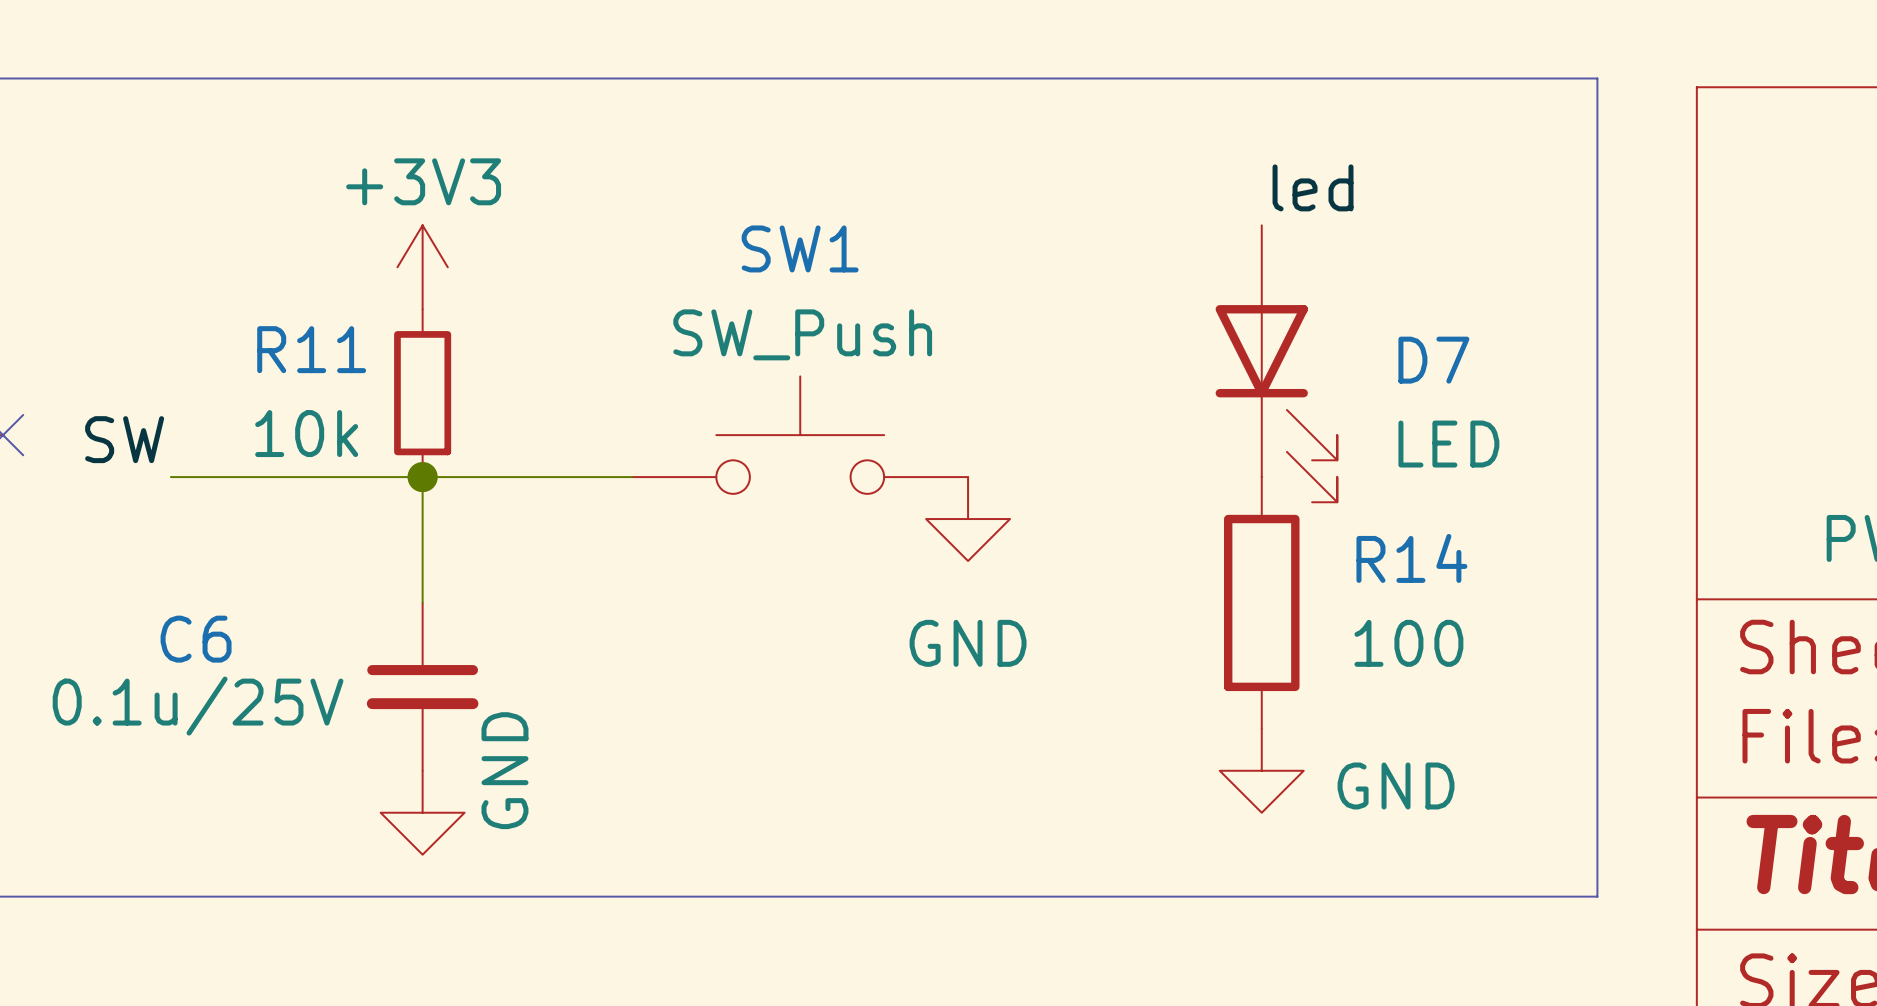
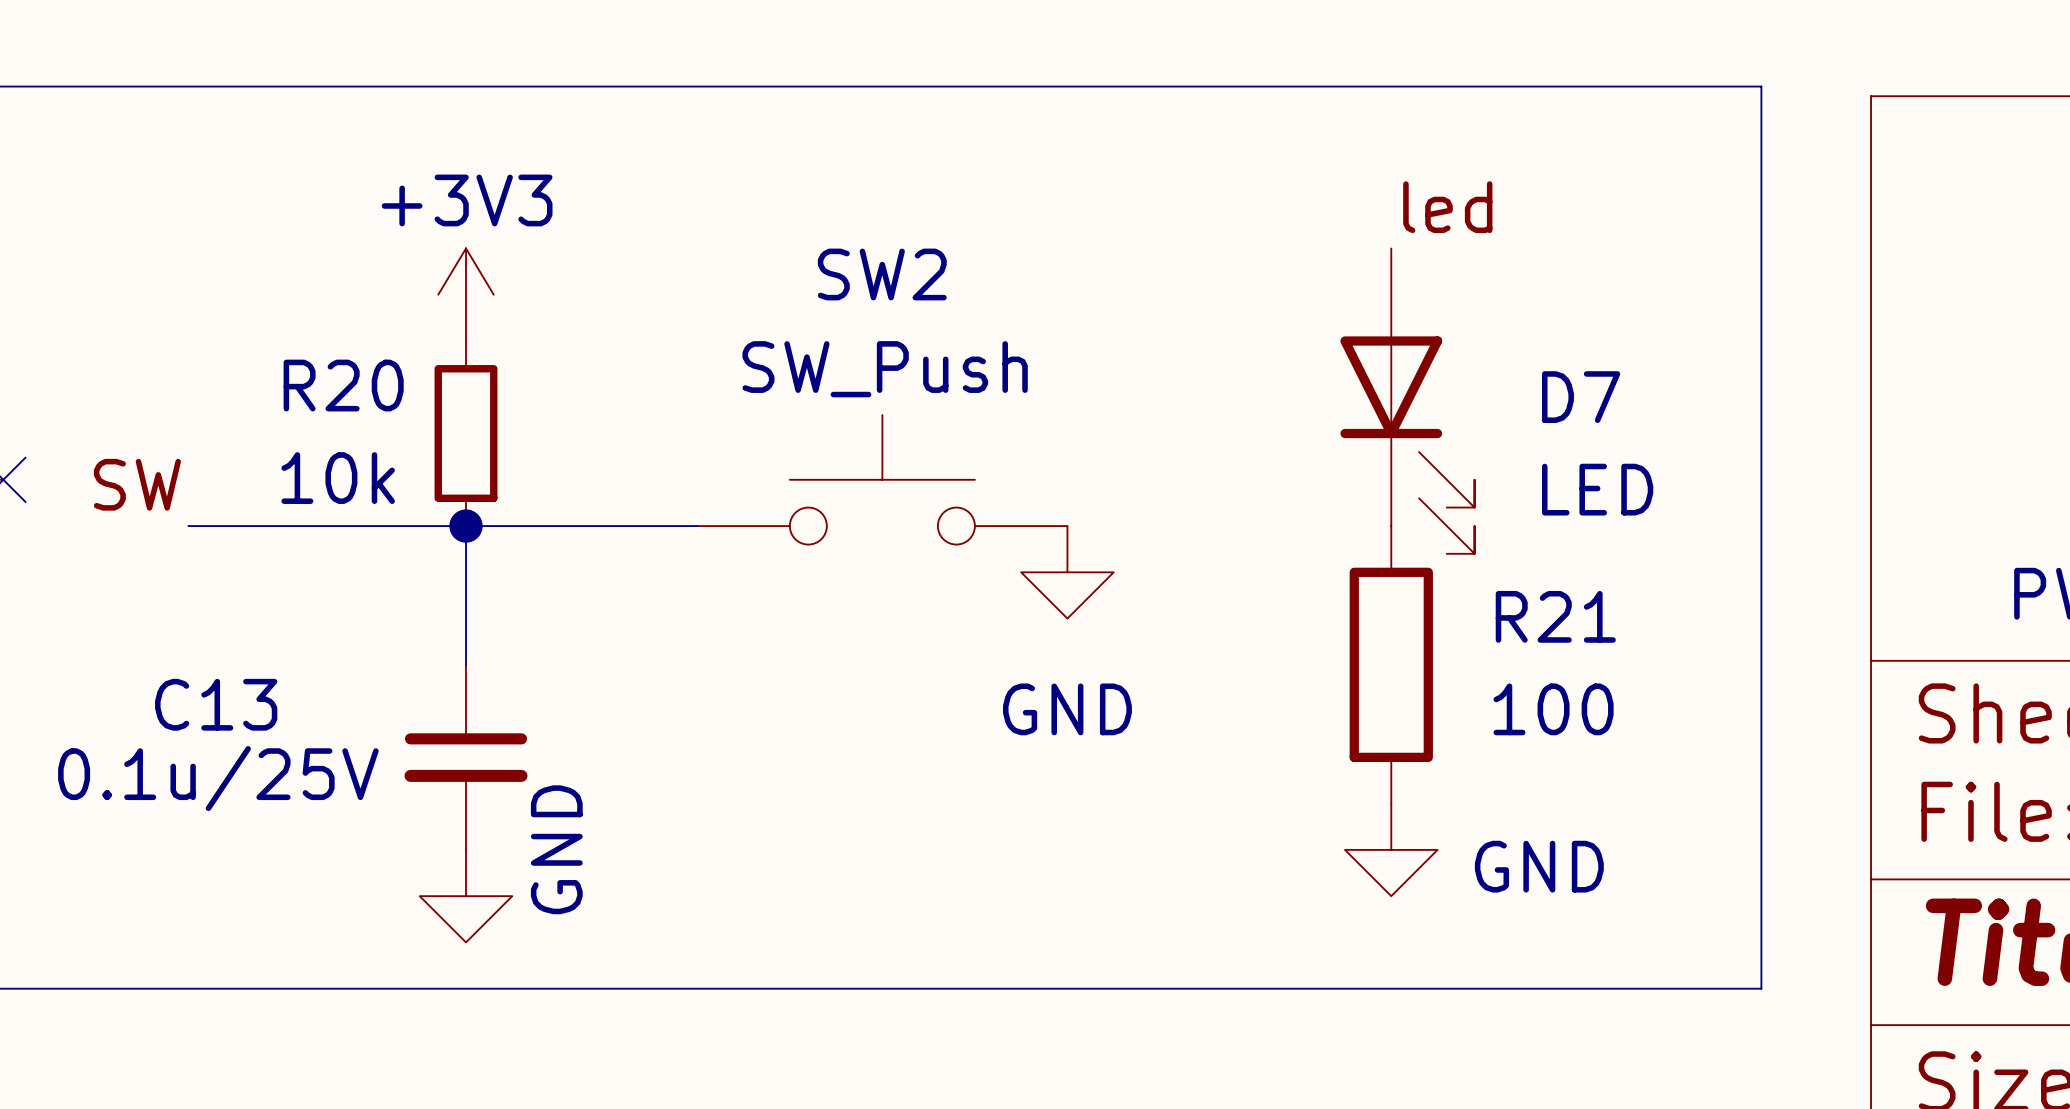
SW1 name: SW1 (800, 248) -> SW2 (882, 274)
R11 name: R11 (311, 349) -> R20 (343, 385)
R14 name: R14 (1411, 558) -> R21 (1555, 616)
C6 name: C6 (196, 639) -> C13 (216, 704)

